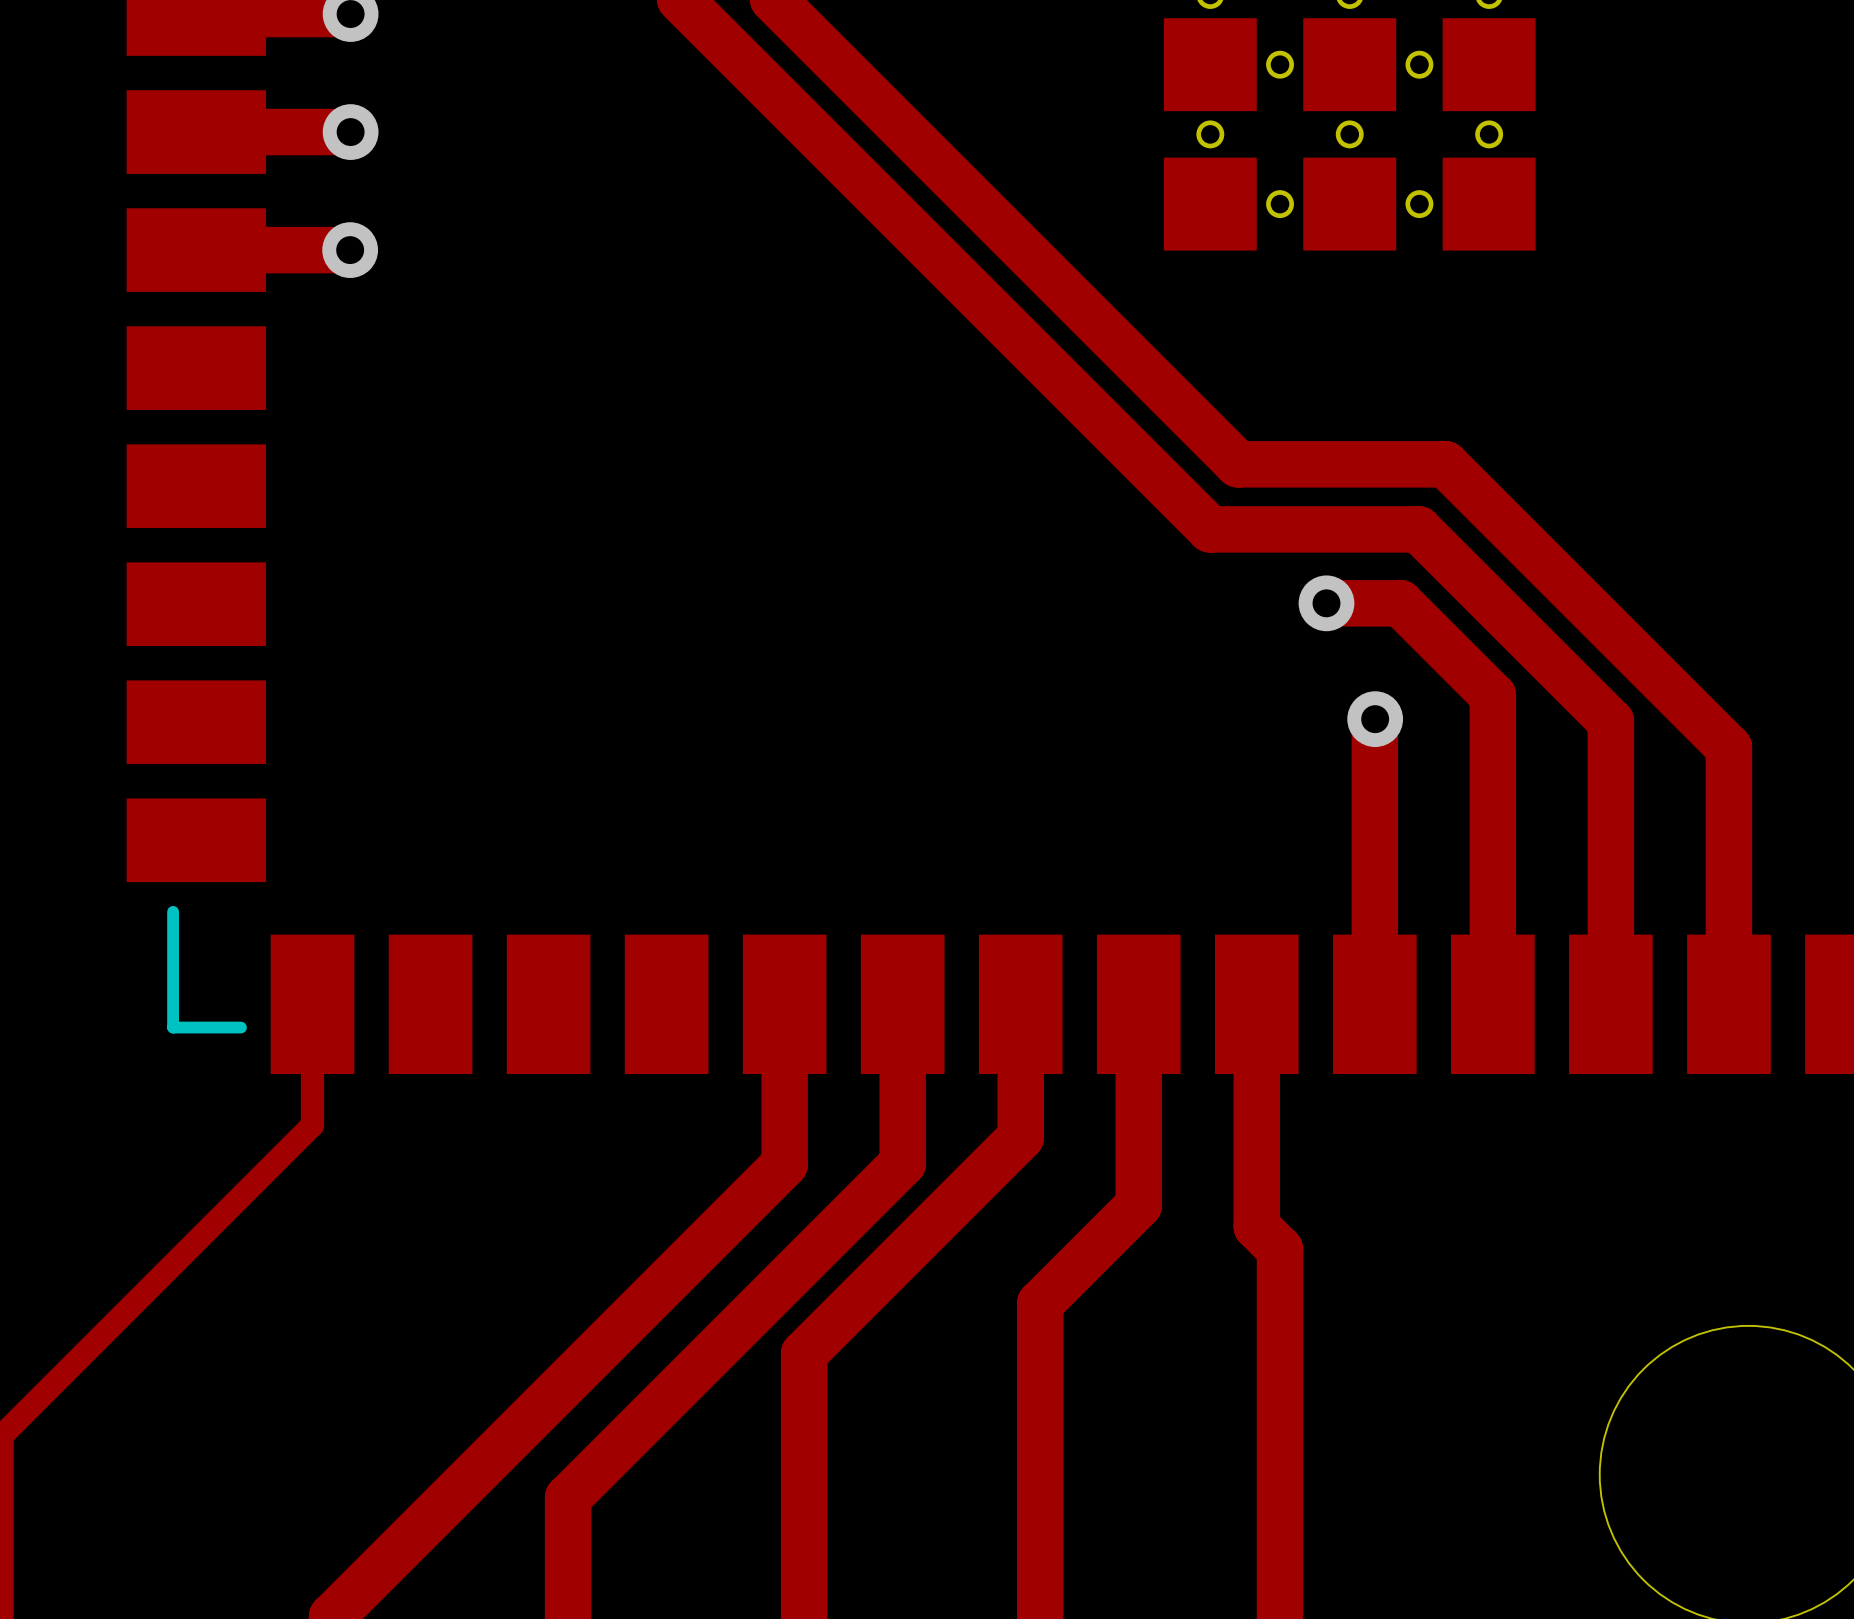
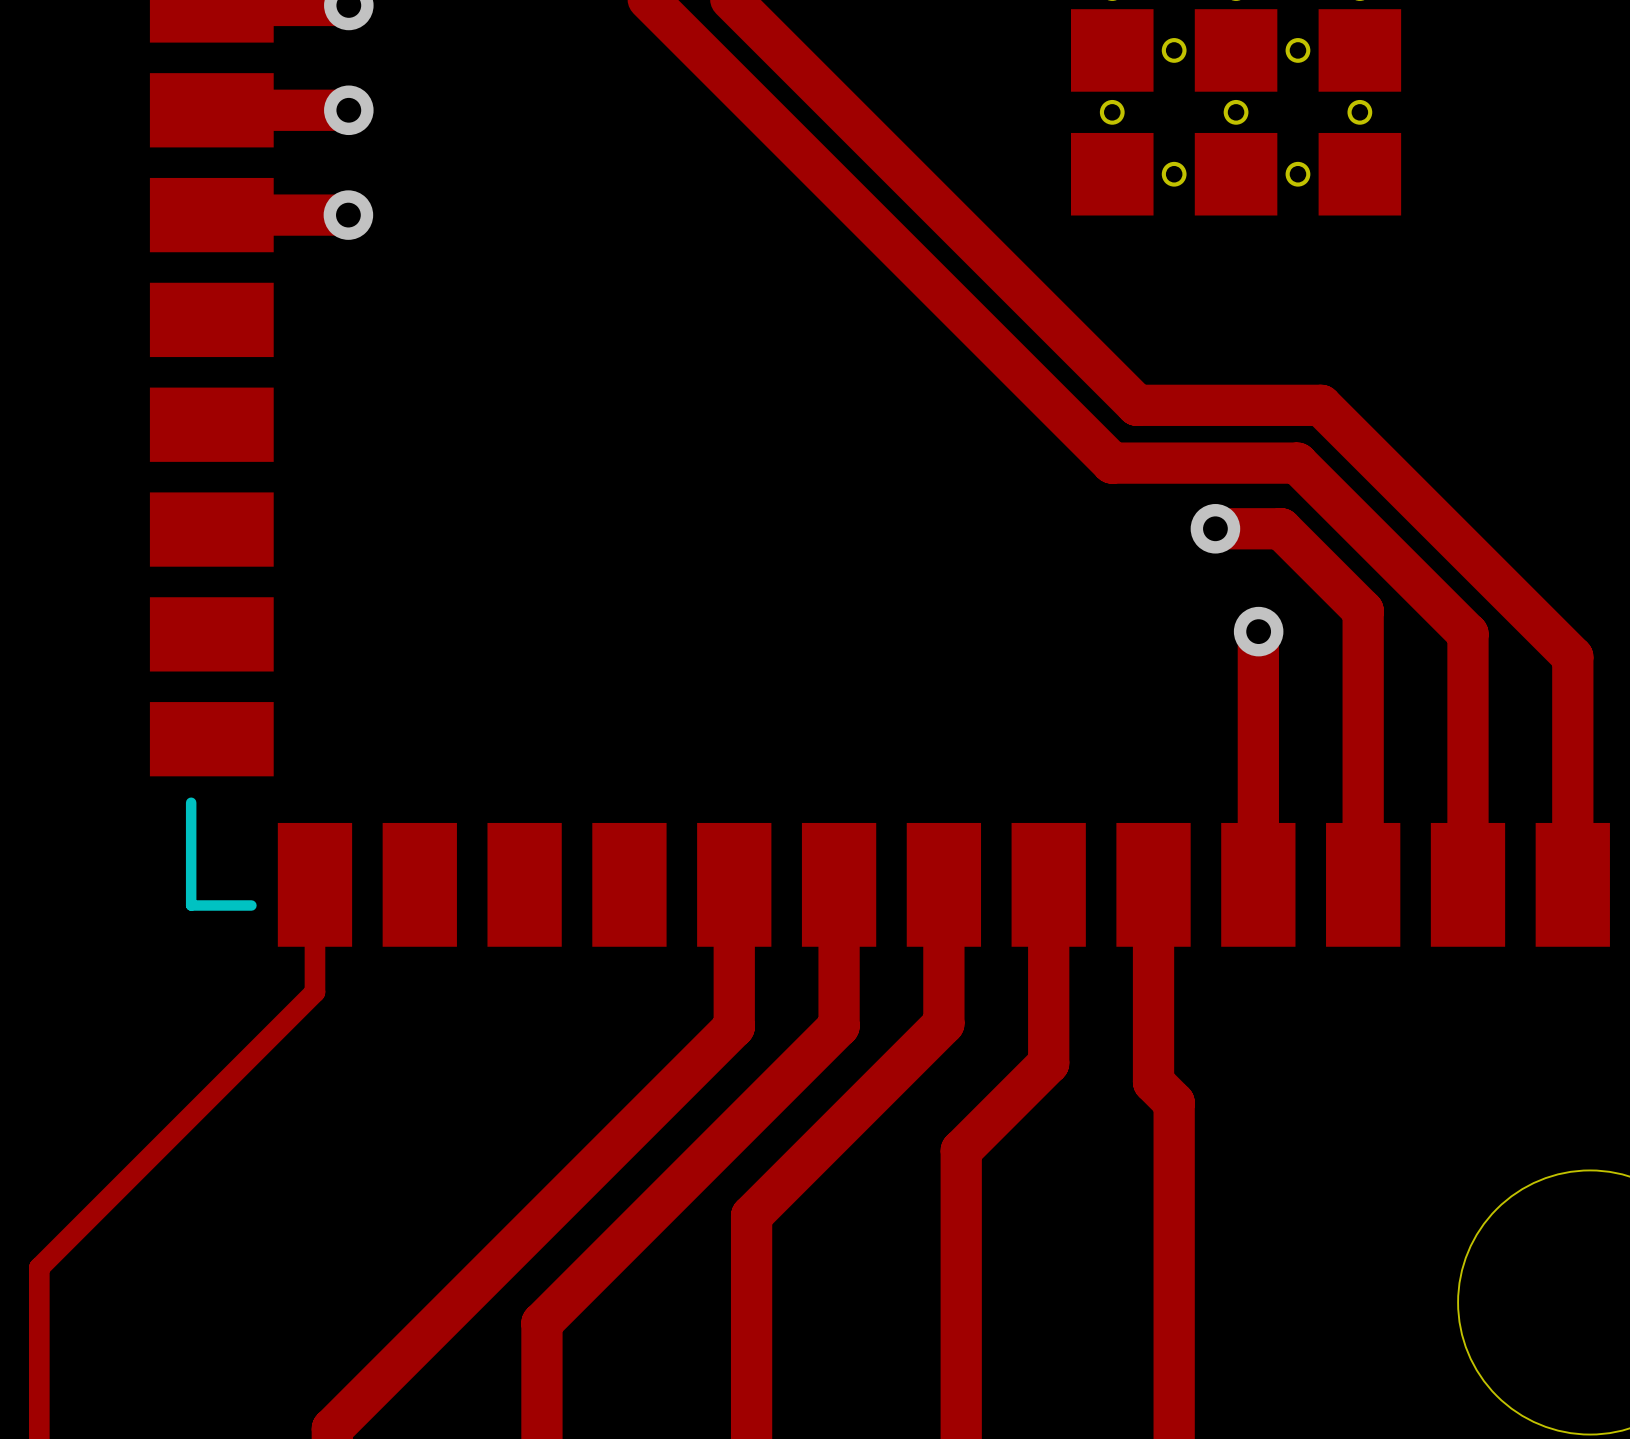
track: (1020, 1137) (804, 1353) (804, 1377) -> (943, 1002) (943, 1023) (751, 1215)

